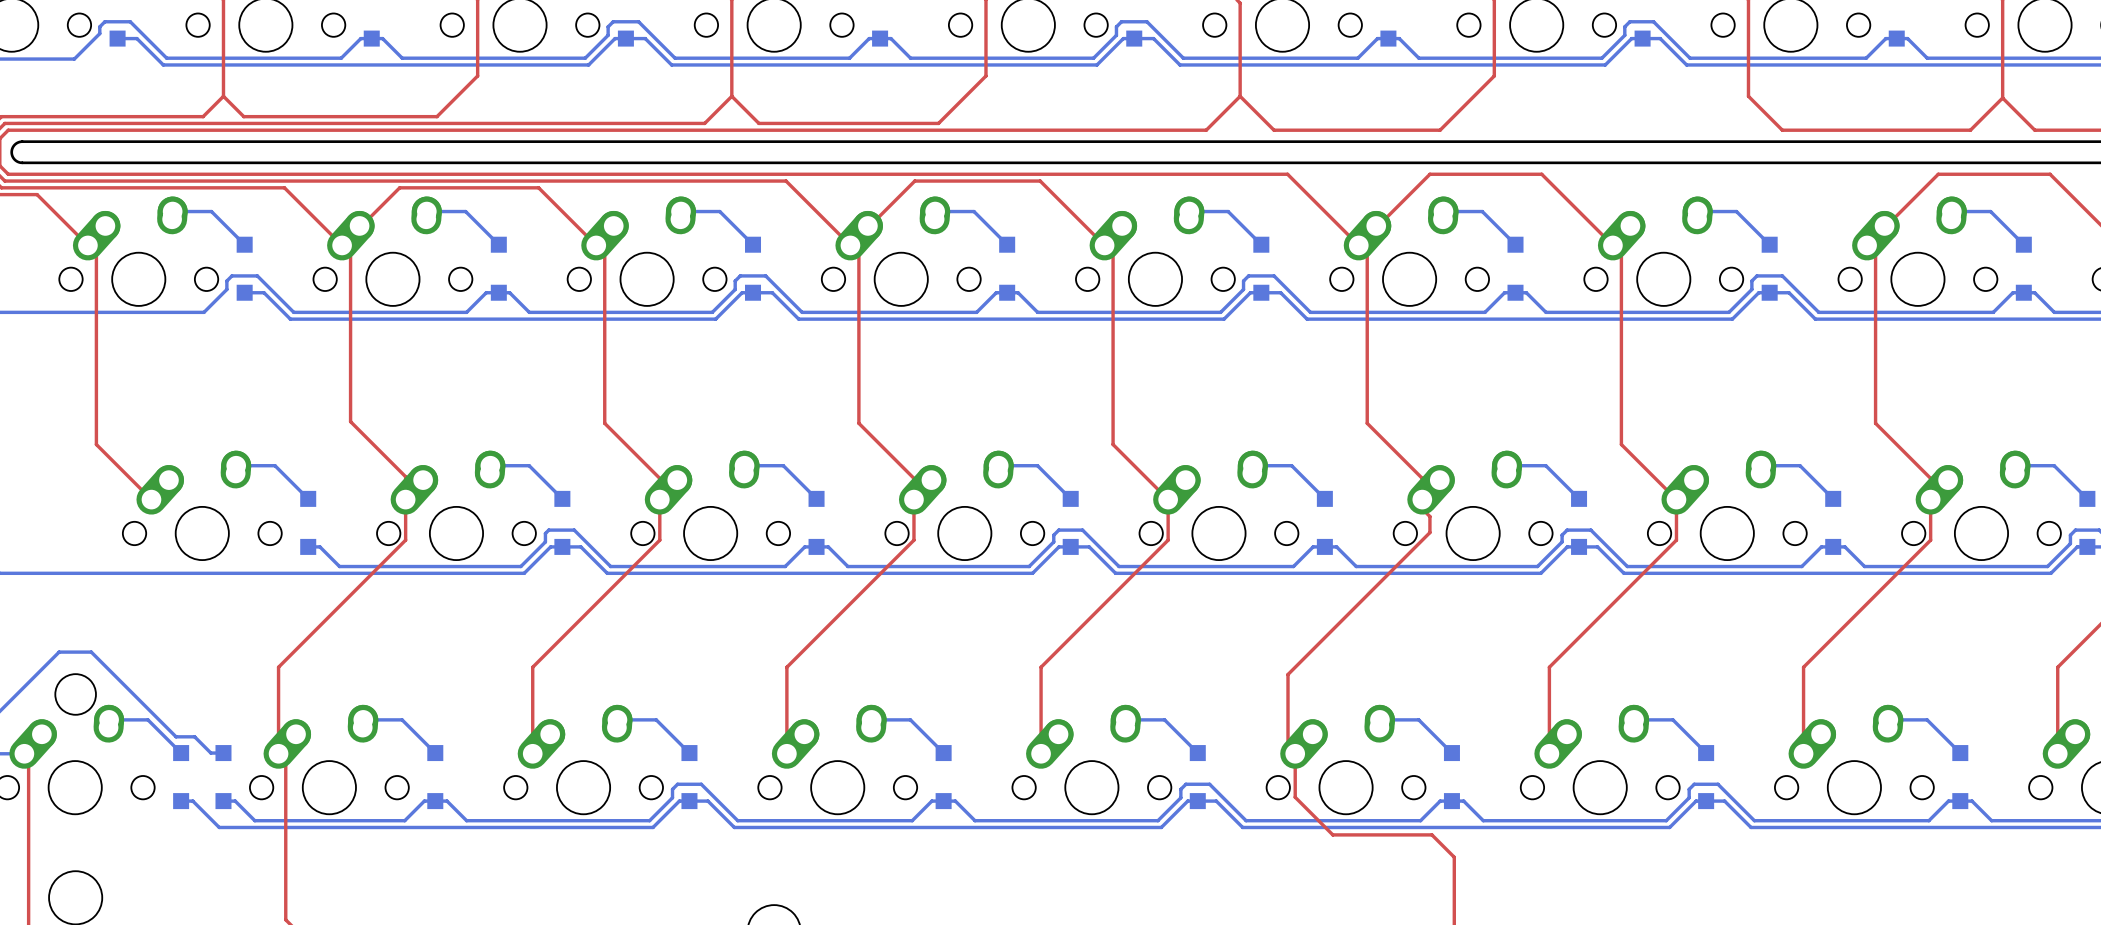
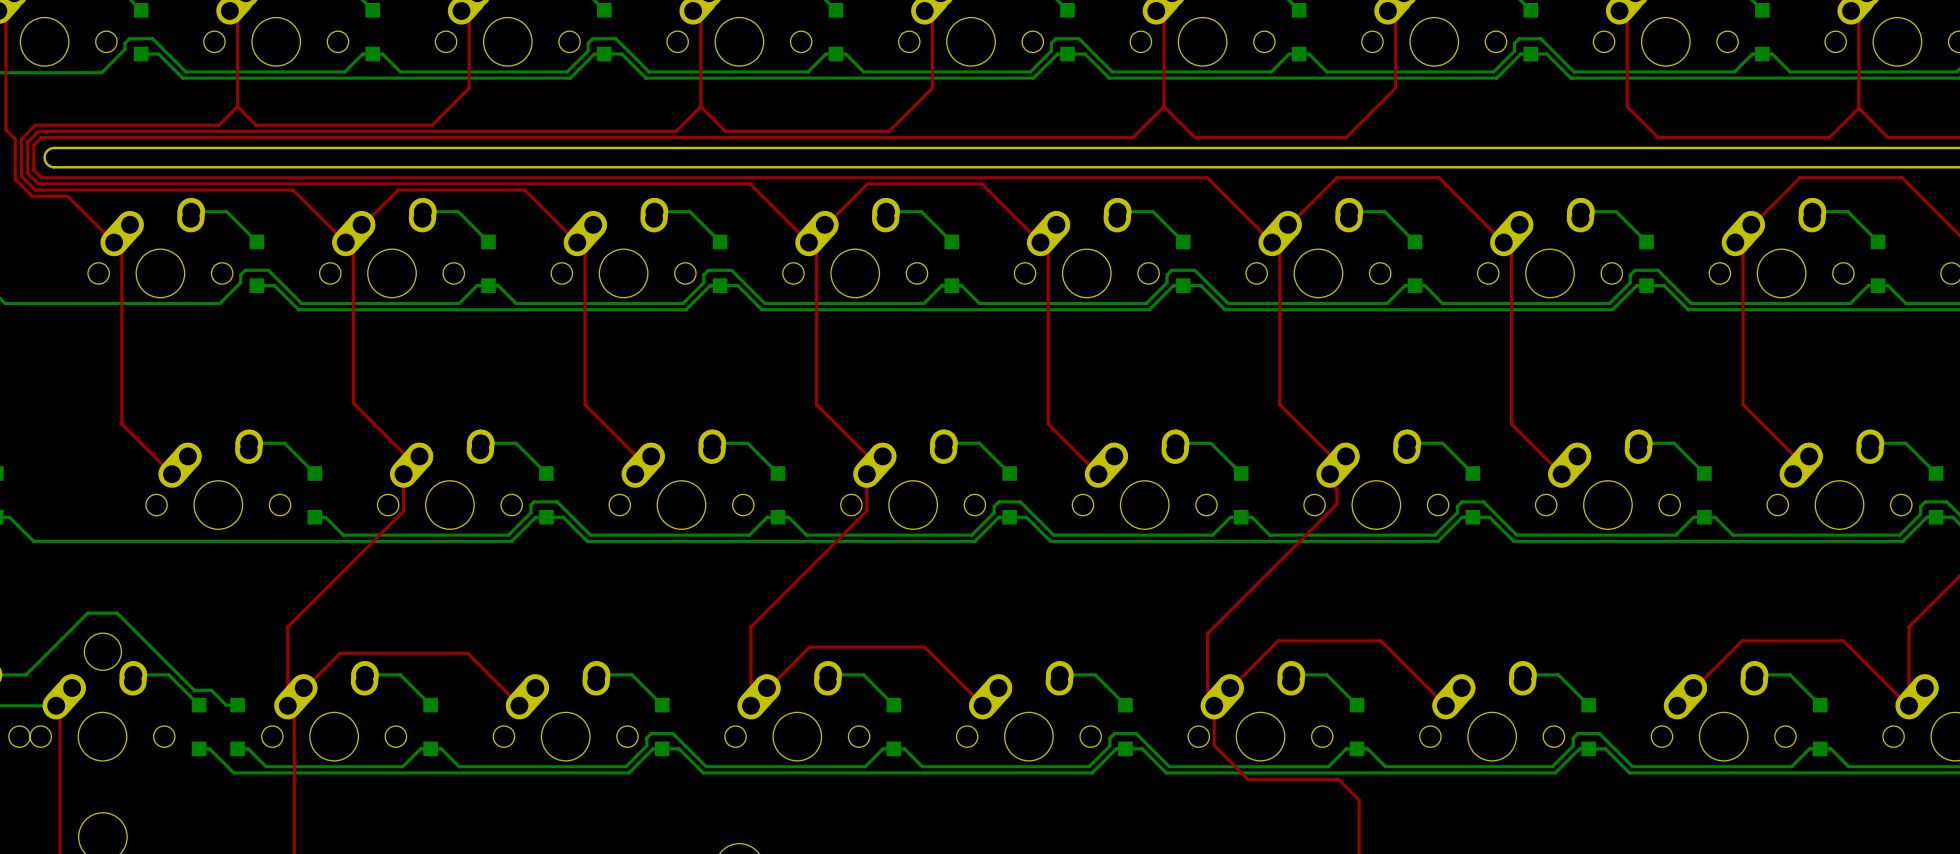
top track: (659, 499) (659, 540) (532, 667) (532, 752) -> (287, 705) (340, 653) (467, 653) (519, 704)
top track: (1168, 499) (1168, 540) (1041, 667) (1041, 752) -> (751, 705) (809, 647) (924, 647) (982, 704)
top track: (1676, 499) (1676, 540) (1549, 667) (1549, 753) -> (1214, 704) (1278, 640) (1380, 640) (1445, 705)
top track: (1930, 499) (1930, 540) (1803, 667) (1803, 753) -> (1908, 705) (1843, 640) (1742, 640) (1677, 705)

